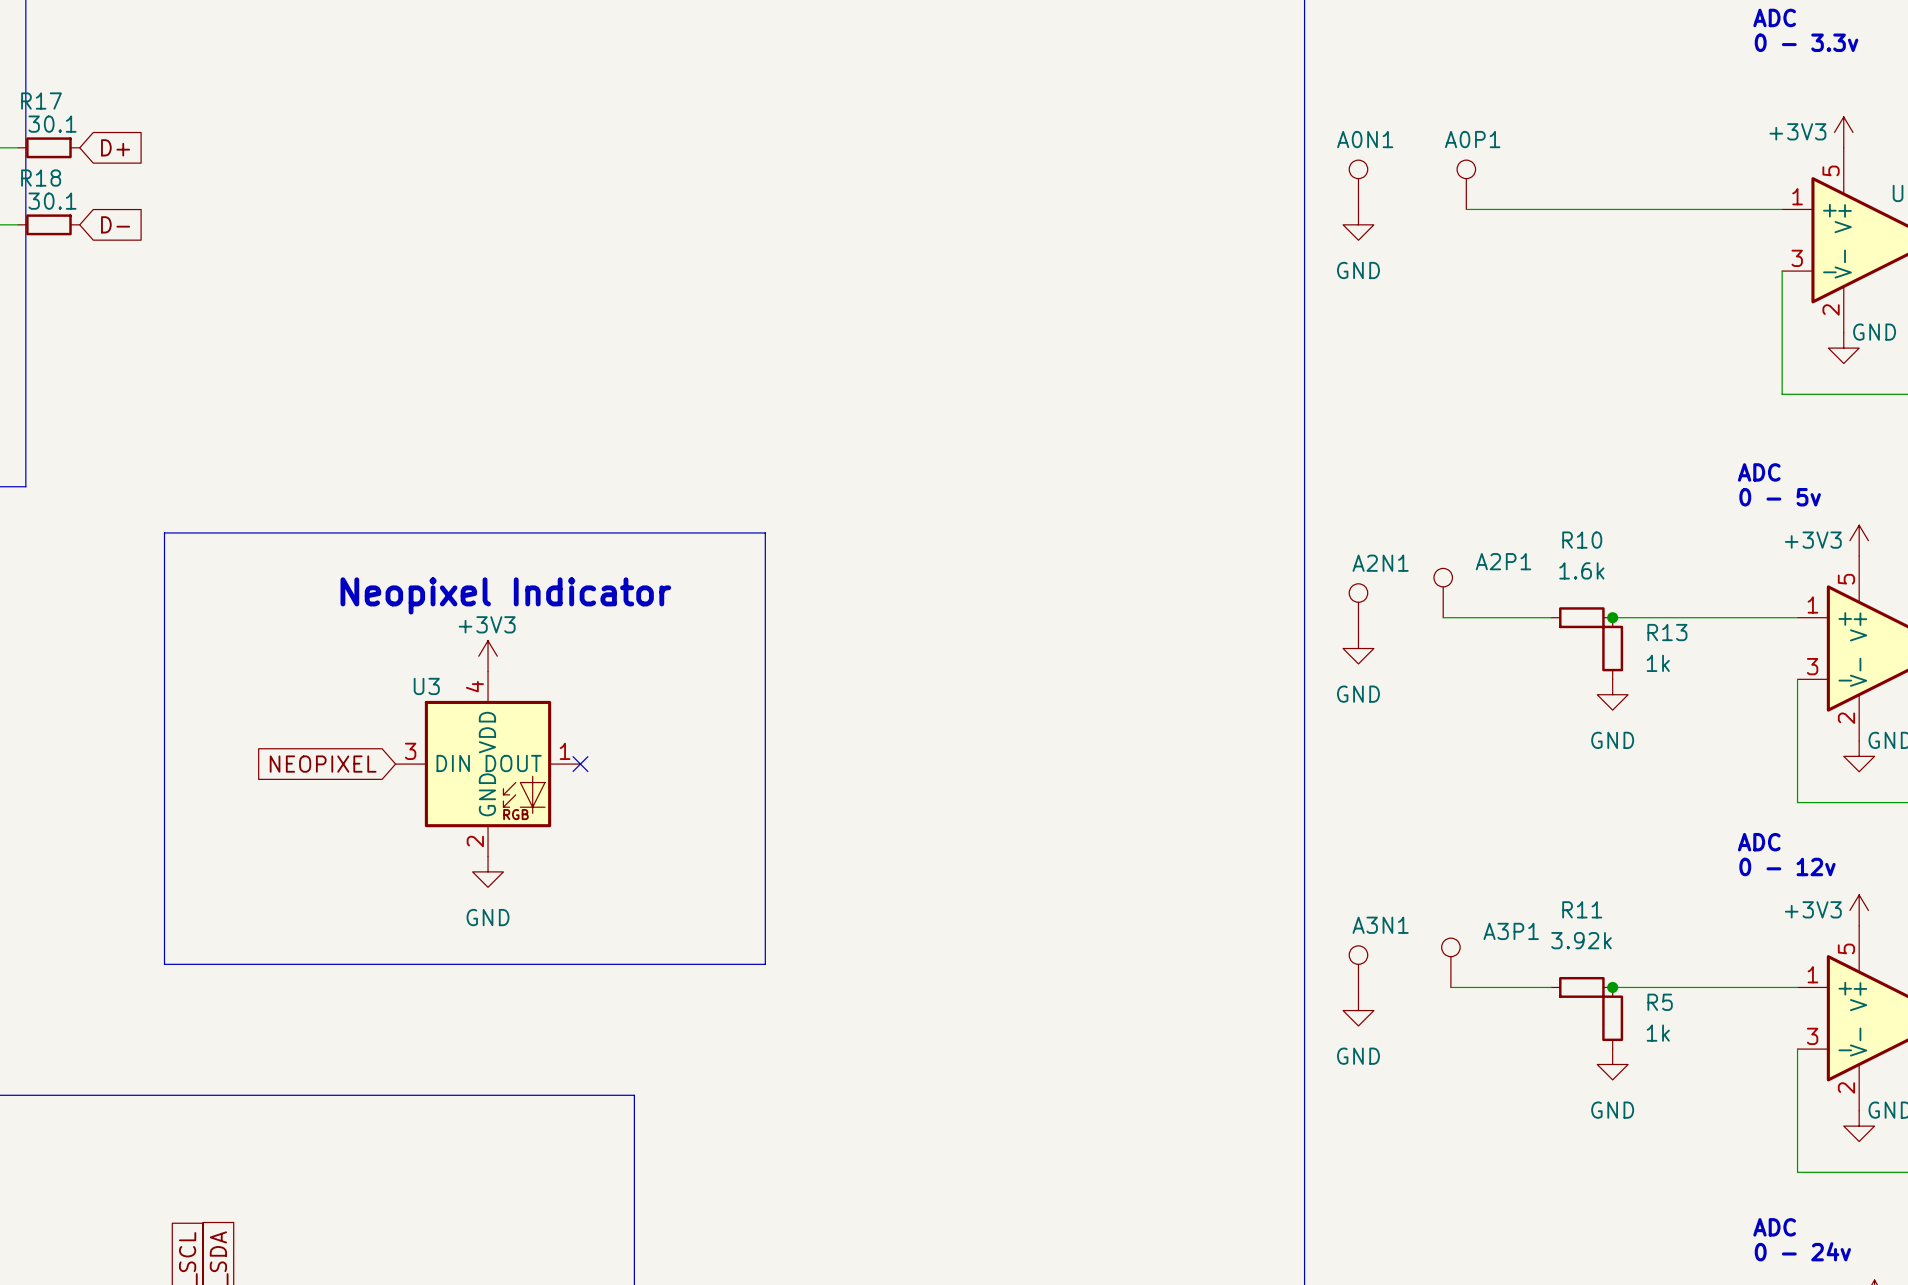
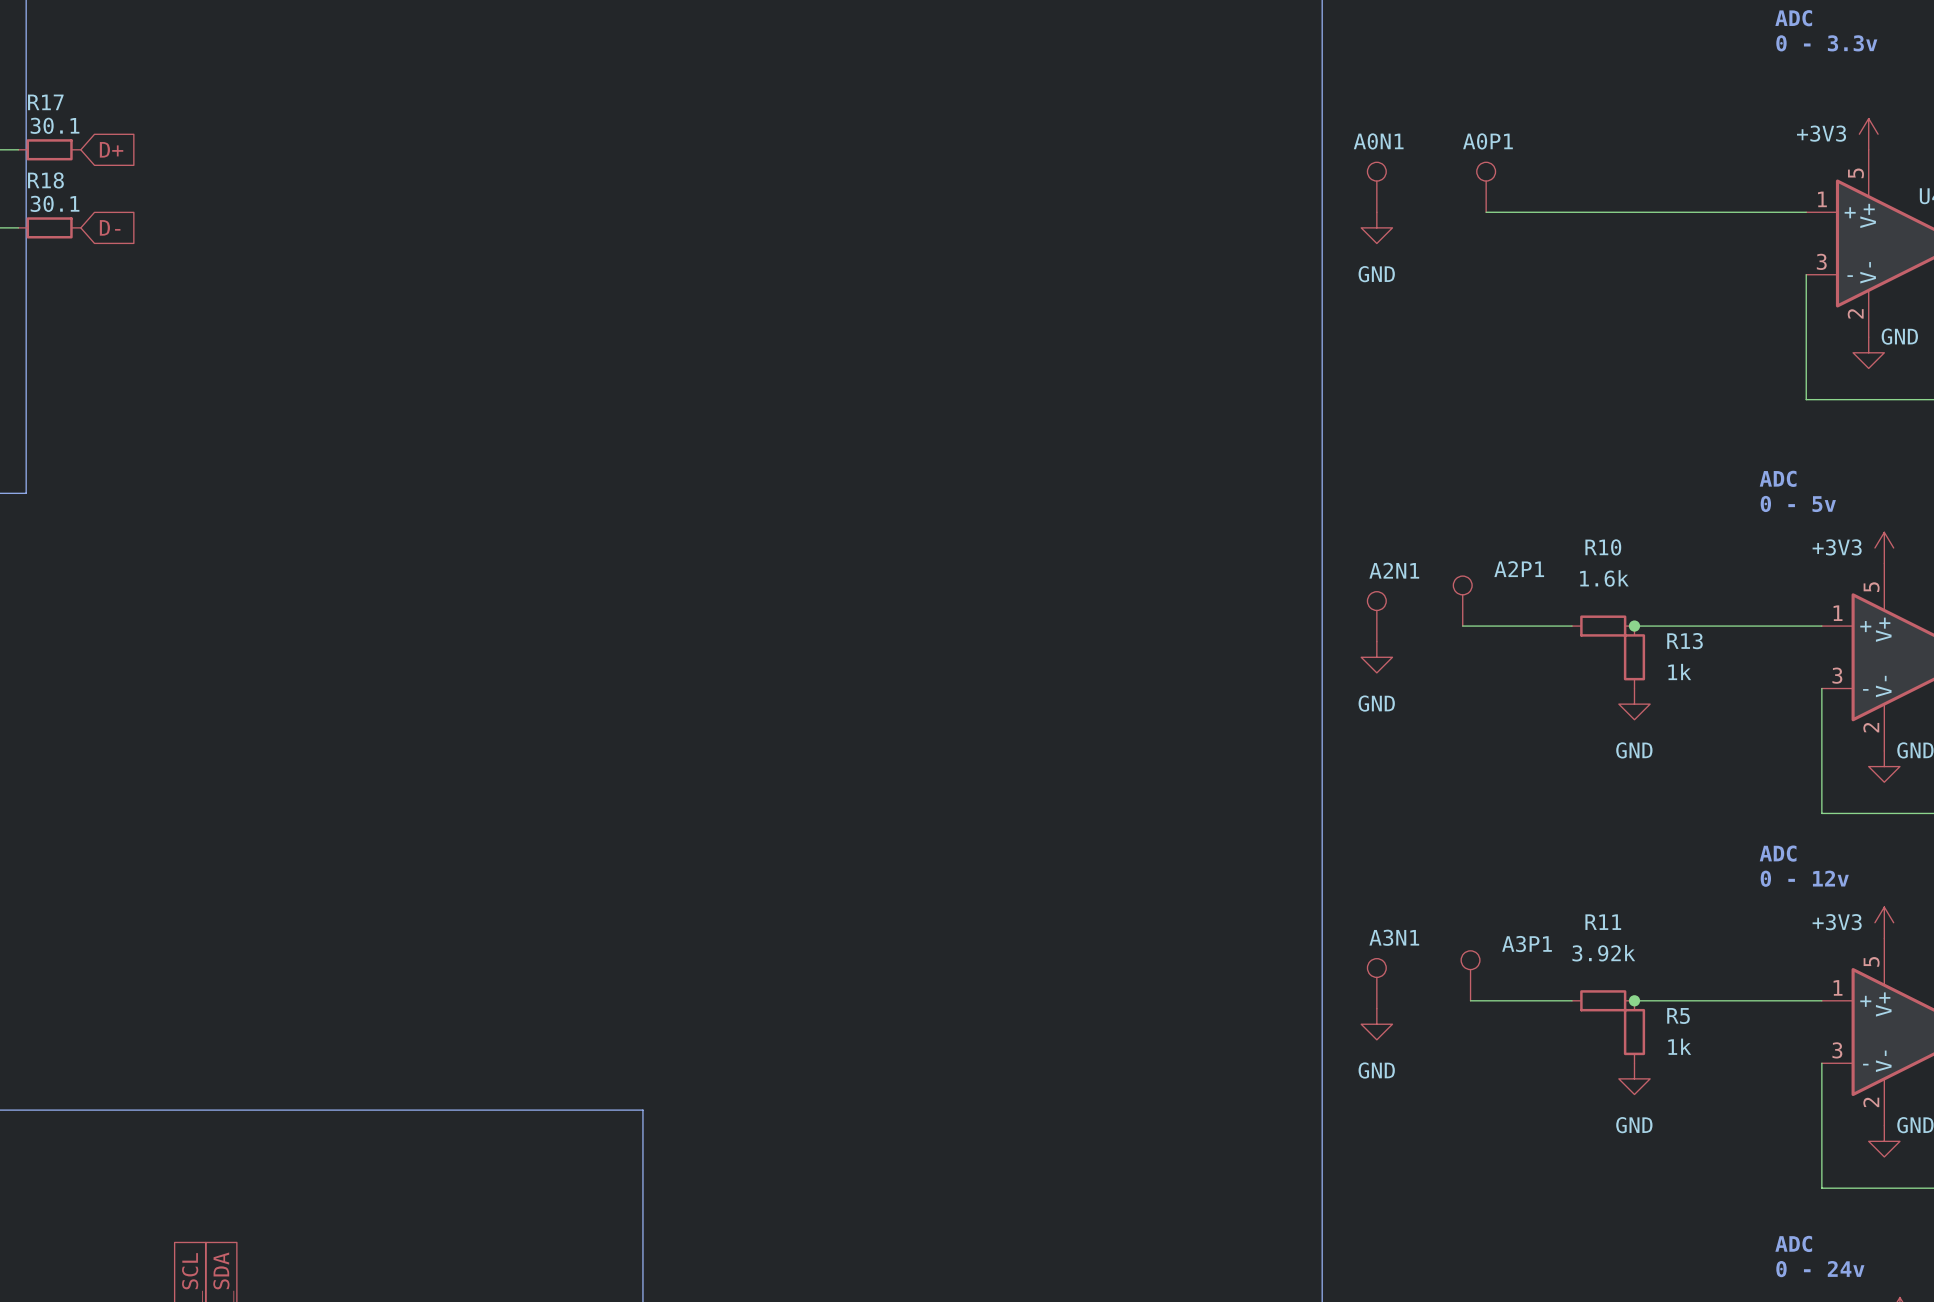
line: (164, 532) (765, 532) (765, 964) (164, 964) (164, 532) -> none
text: Neopixel Indicator (505, 595) -> none
power symbol: +3V3 (488, 656) -> none
global label: NEOPIXEL (323, 764) -> none
U3: (488, 764) -> none
no-connect mark: (580, 764) -> none
power symbol: GND (488, 871) -> none

